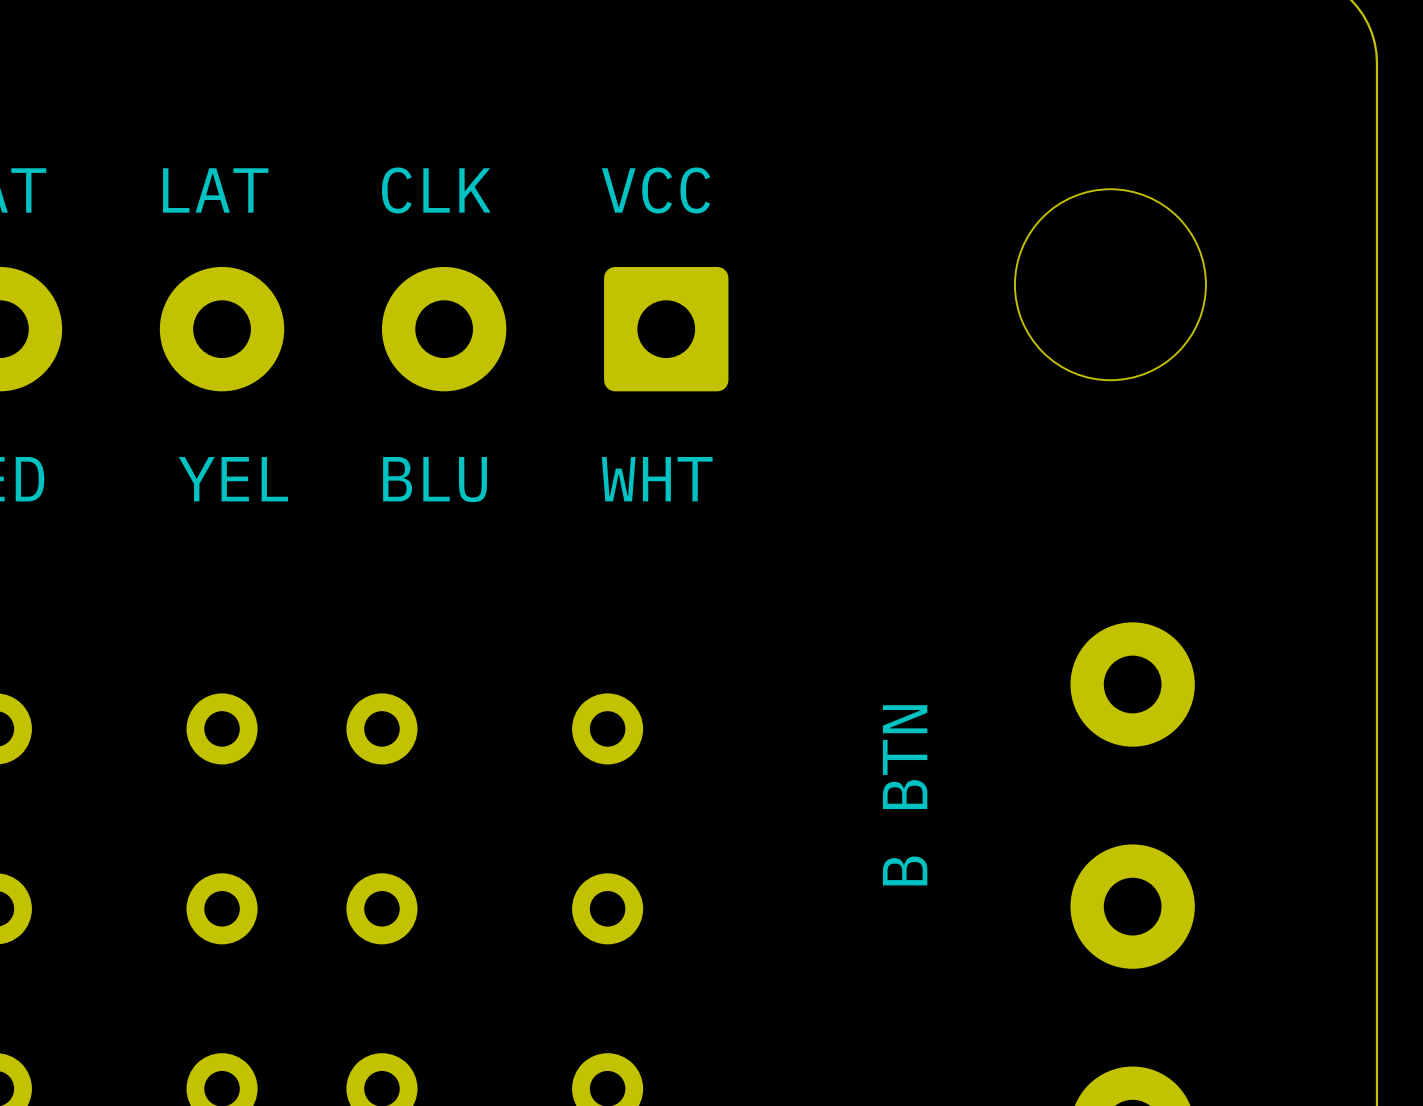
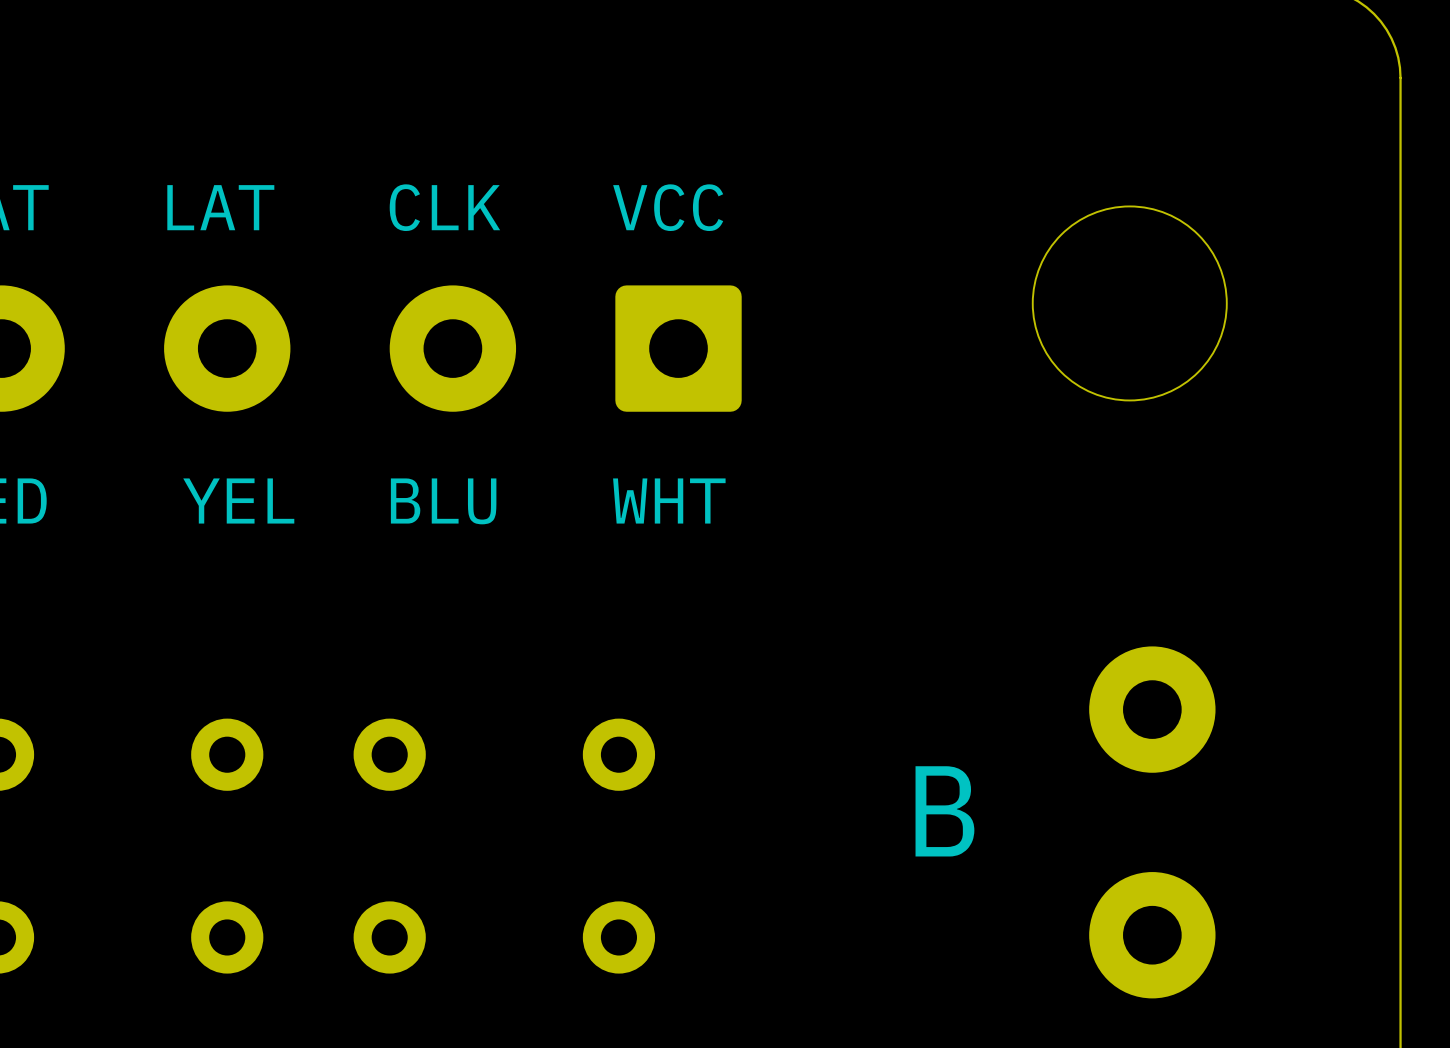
text: none -> B (944, 811)
text: B BTN (905, 795) -> none

